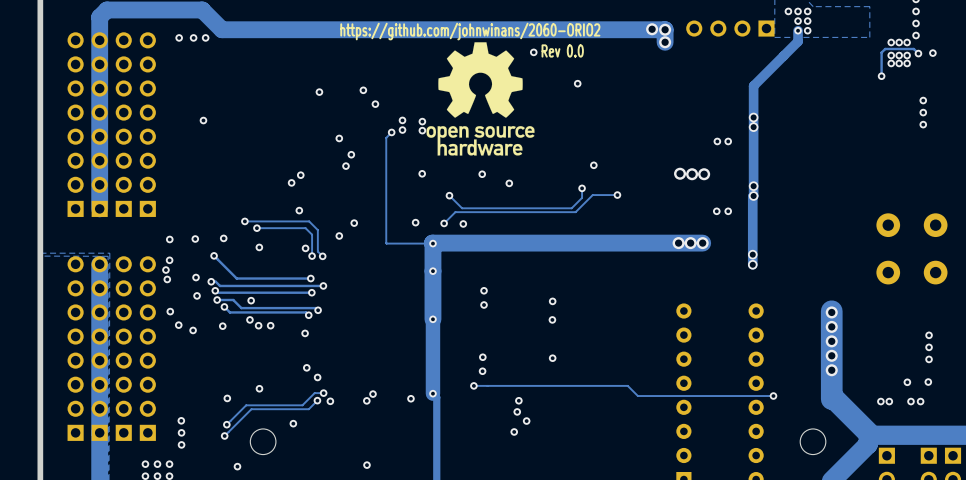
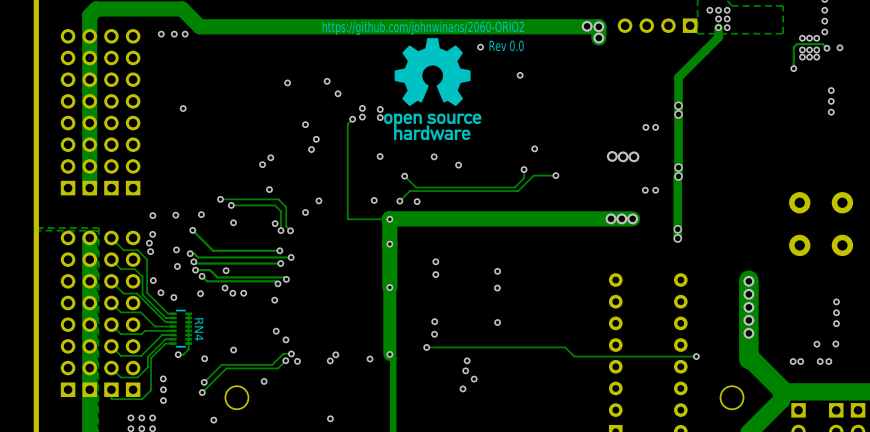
track: none -> (111, 237) (123, 250) (137, 250) (147, 259) (147, 292) (168, 313) (173, 313)
track: none -> (111, 259) (120, 269) (134, 269) (142, 276) (142, 294) (165, 317) (173, 317)
track: none -> (111, 281) (123, 293) (137, 293) (165, 322) (173, 322)
track: none -> (111, 303) (120, 312) (140, 312) (155, 326) (173, 326)
track: none -> (188, 313) (188, 349) (183, 354) (178, 354)
track: none -> (111, 324) (120, 334) (141, 334) (145, 330) (173, 330)
RN4: none -> (180, 328)
track: none -> (173, 335) (162, 335) (141, 355) (120, 355) (111, 346)
track: none -> (173, 339) (165, 339) (147, 356) (147, 367) (137, 377) (120, 377) (111, 368)
track: none -> (173, 343) (165, 343) (151, 358) (151, 390) (142, 399) (111, 399) (111, 389)
via: none -> (178, 354)

